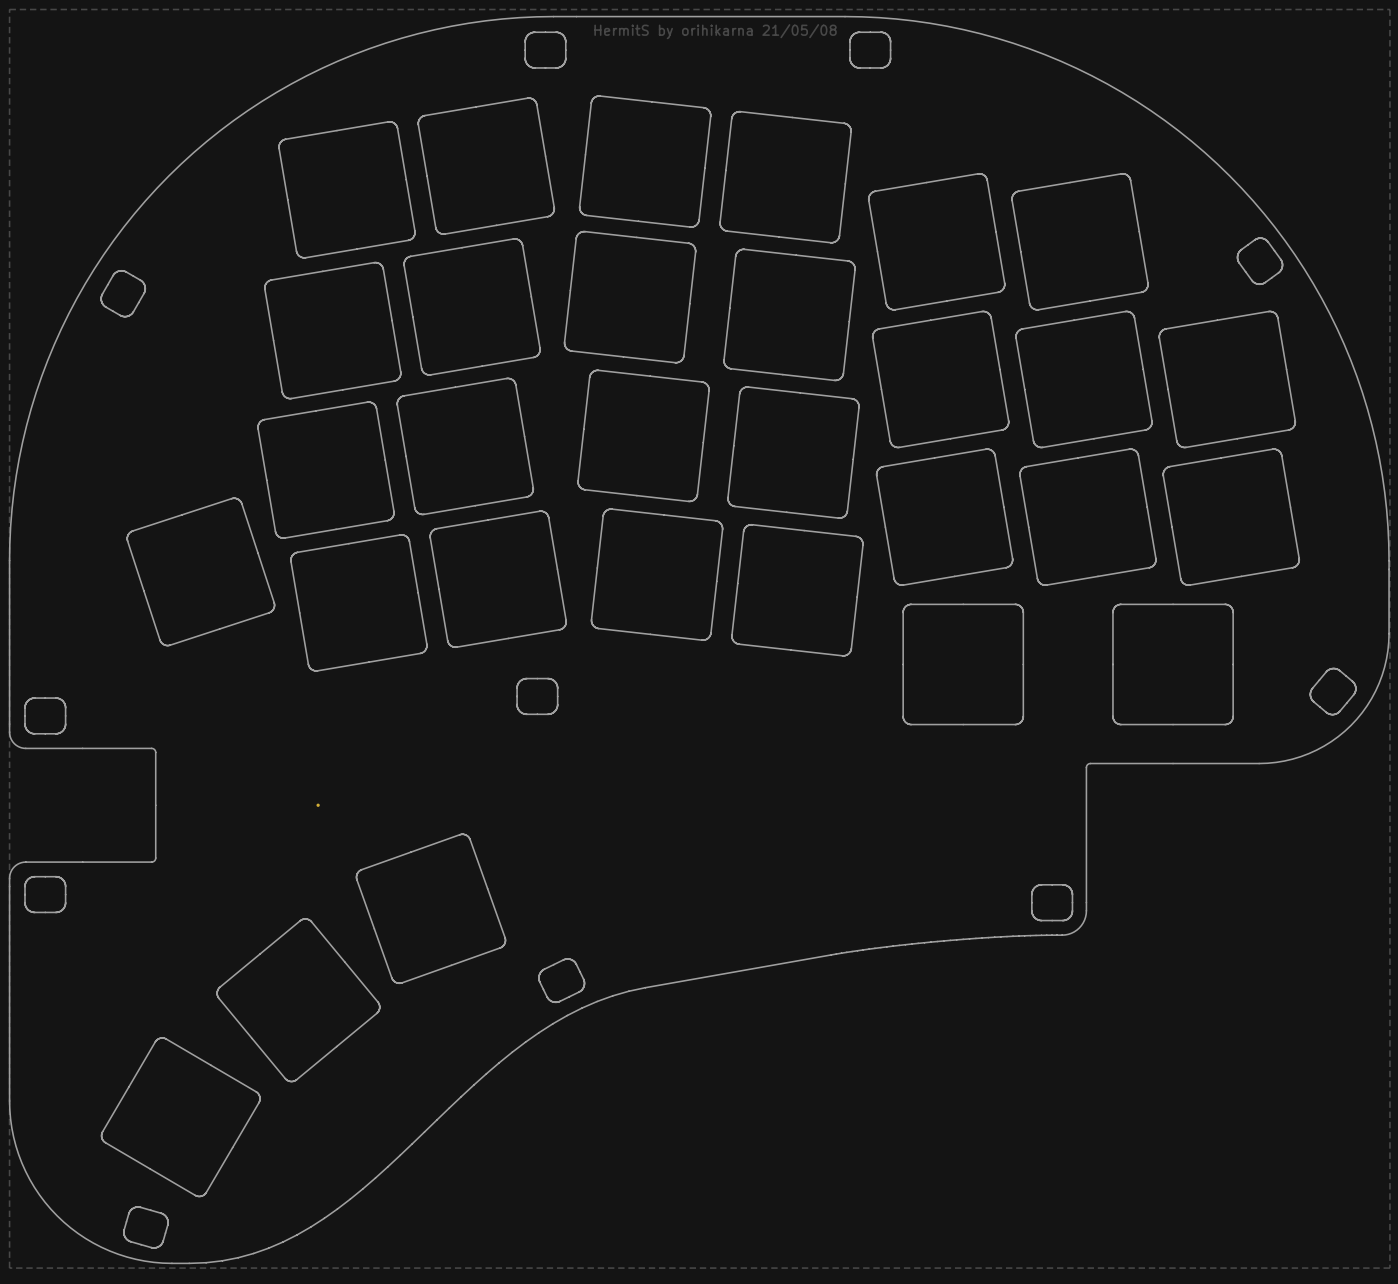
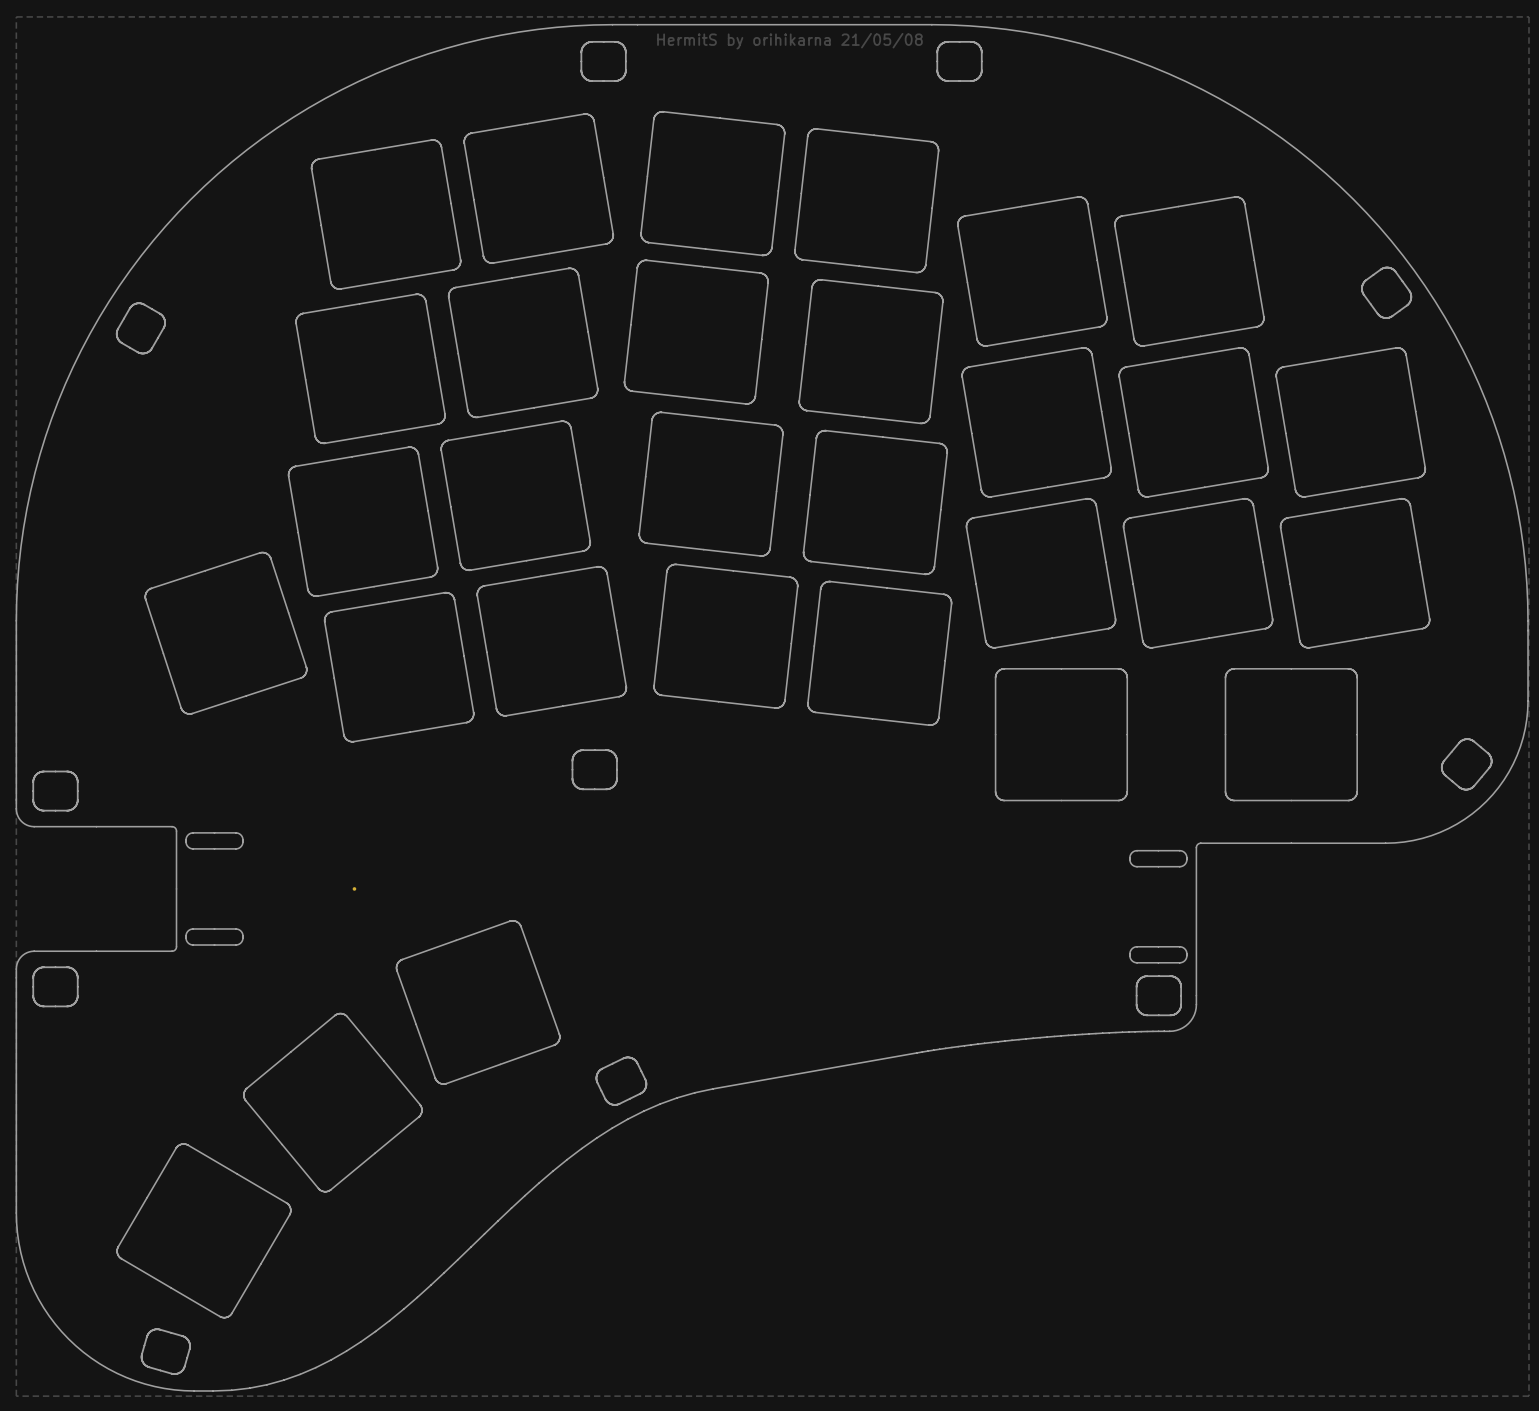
board edge: none -> (193, 832) (237, 833) (242, 837) (242, 843) (236, 848) (191, 848) (186, 845) (186, 839) (188, 834) (193, 832)
board edge: none -> (1137, 850) (1181, 850) (1186, 855) (1186, 861) (1180, 866) (1135, 866) (1130, 863) (1129, 856) (1132, 852) (1137, 850)
board edge: none -> (193, 928) (237, 929) (242, 933) (242, 939) (236, 944) (191, 944) (186, 941) (186, 935) (188, 931) (193, 928)
board edge: none -> (1137, 946) (1181, 947) (1186, 951) (1186, 957) (1180, 962) (1135, 962) (1130, 959) (1129, 952) (1132, 948) (1137, 946)

